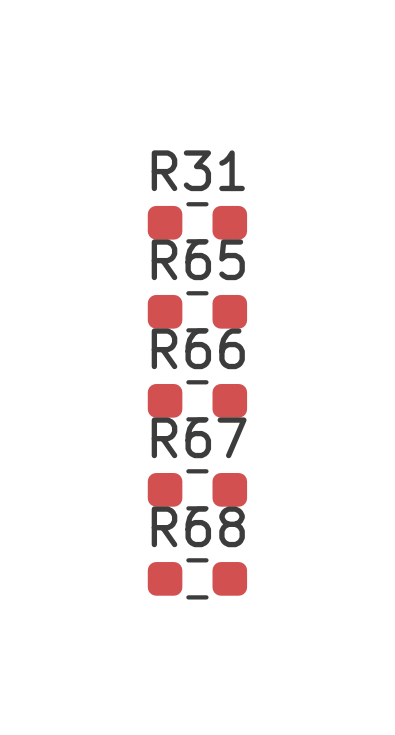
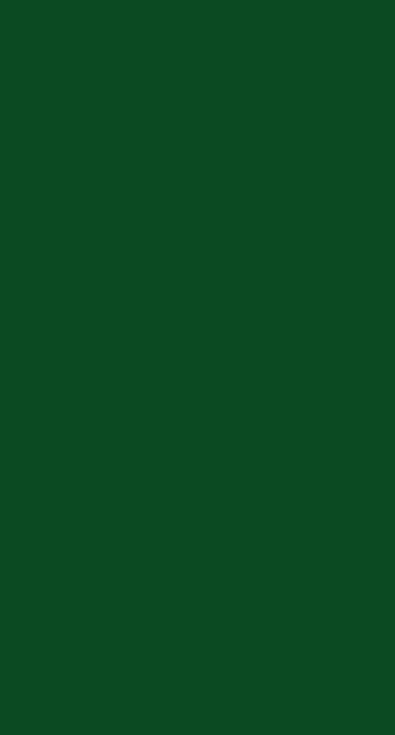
R31: (197, 222) -> none
R65: (197, 311) -> none
R66: (197, 400) -> none
R67: (197, 489) -> none
R68: (197, 578) -> none

